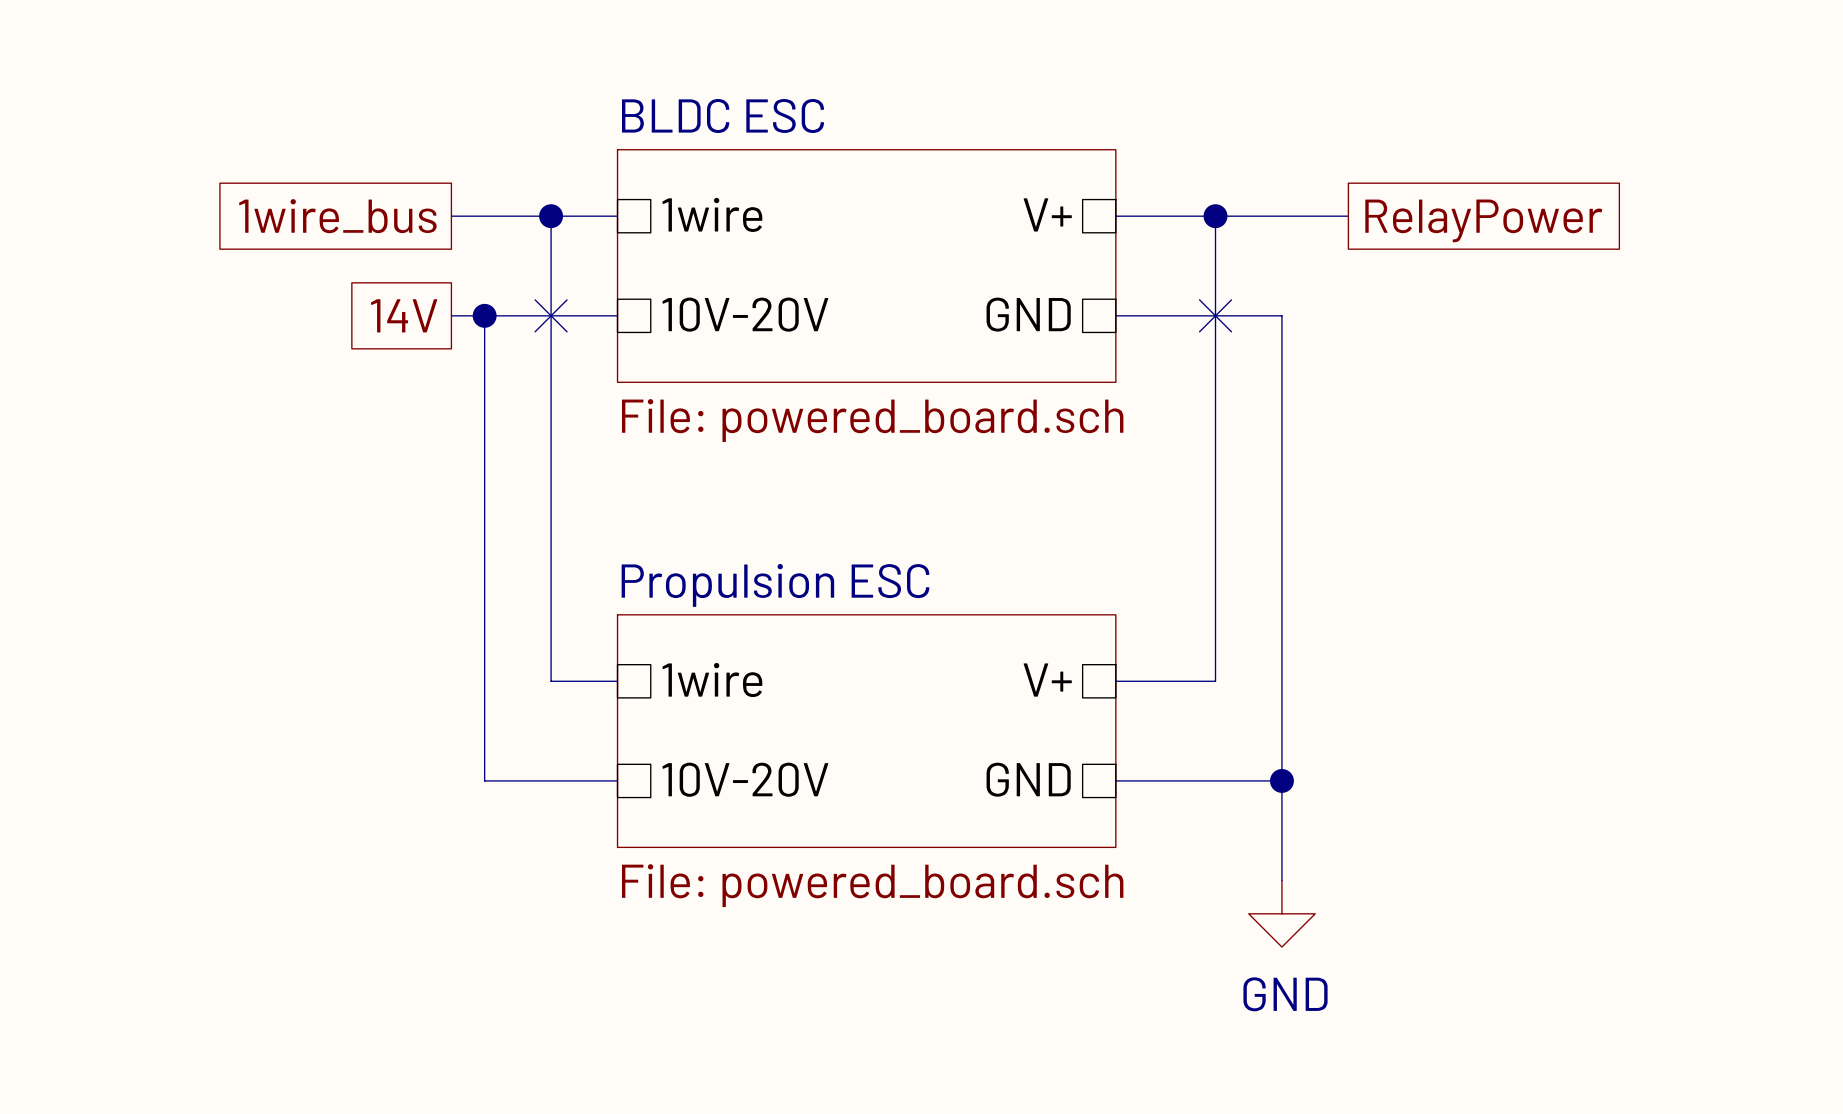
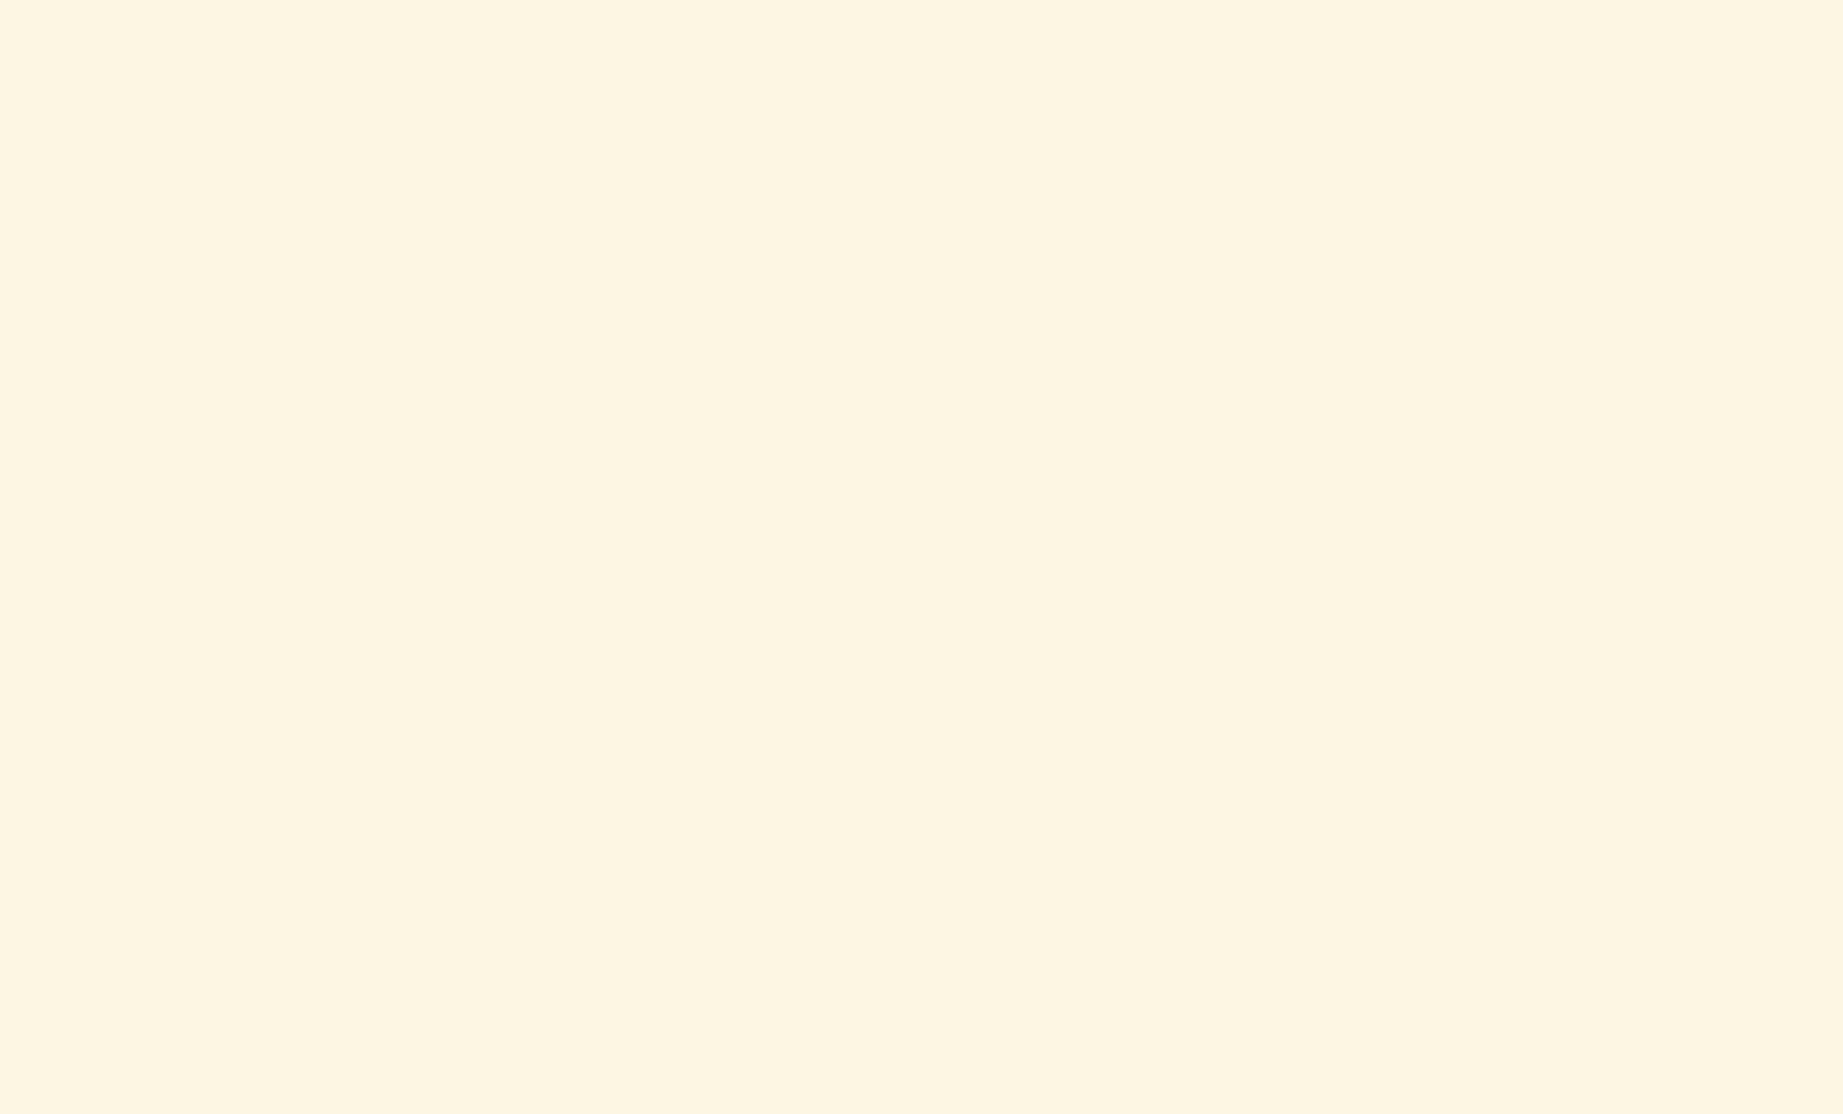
sheet pin: 1wire (712, 214) -> none
sheet pin: V+ (1047, 214) -> none
global label: 1wire_bus (337, 216) -> none
wire: (451, 216) (617, 216) -> none
wire: (551, 216) (551, 681) (617, 681) -> none
junction: (551, 216) -> none
wire: (1115, 216) (1348, 216) -> none
wire: (1215, 216) (1215, 681) (1115, 681) -> none
junction: (1215, 216) -> none
global label: RelayPower (1483, 220) -> none
sheet BLDC ESC: File: powered_board.sch (866, 266) -> none
sheet pin: 10V-20V (745, 314) -> none
sheet pin: GND (1028, 314) -> none
global label: 14V (404, 315) -> none
wire: (451, 315) (617, 315) -> none
wire: (484, 315) (484, 780) (617, 780) -> none
junction: (484, 315) -> none
no-connect mark: (551, 315) -> none
wire: (1115, 315) (1281, 315) (1281, 880) -> none
no-connect mark: (1215, 315) -> none
sheet pin: 1wire (712, 680) -> none
sheet pin: V+ (1047, 680) -> none
sheet Propulsion ESC: File: powered_board.sch (866, 731) -> none
sheet pin: 10V-20V (745, 779) -> none
sheet pin: GND (1028, 779) -> none
wire: (1115, 780) (1281, 780) -> none
junction: (1281, 780) -> none
power symbol: GND (1281, 913) -> none

